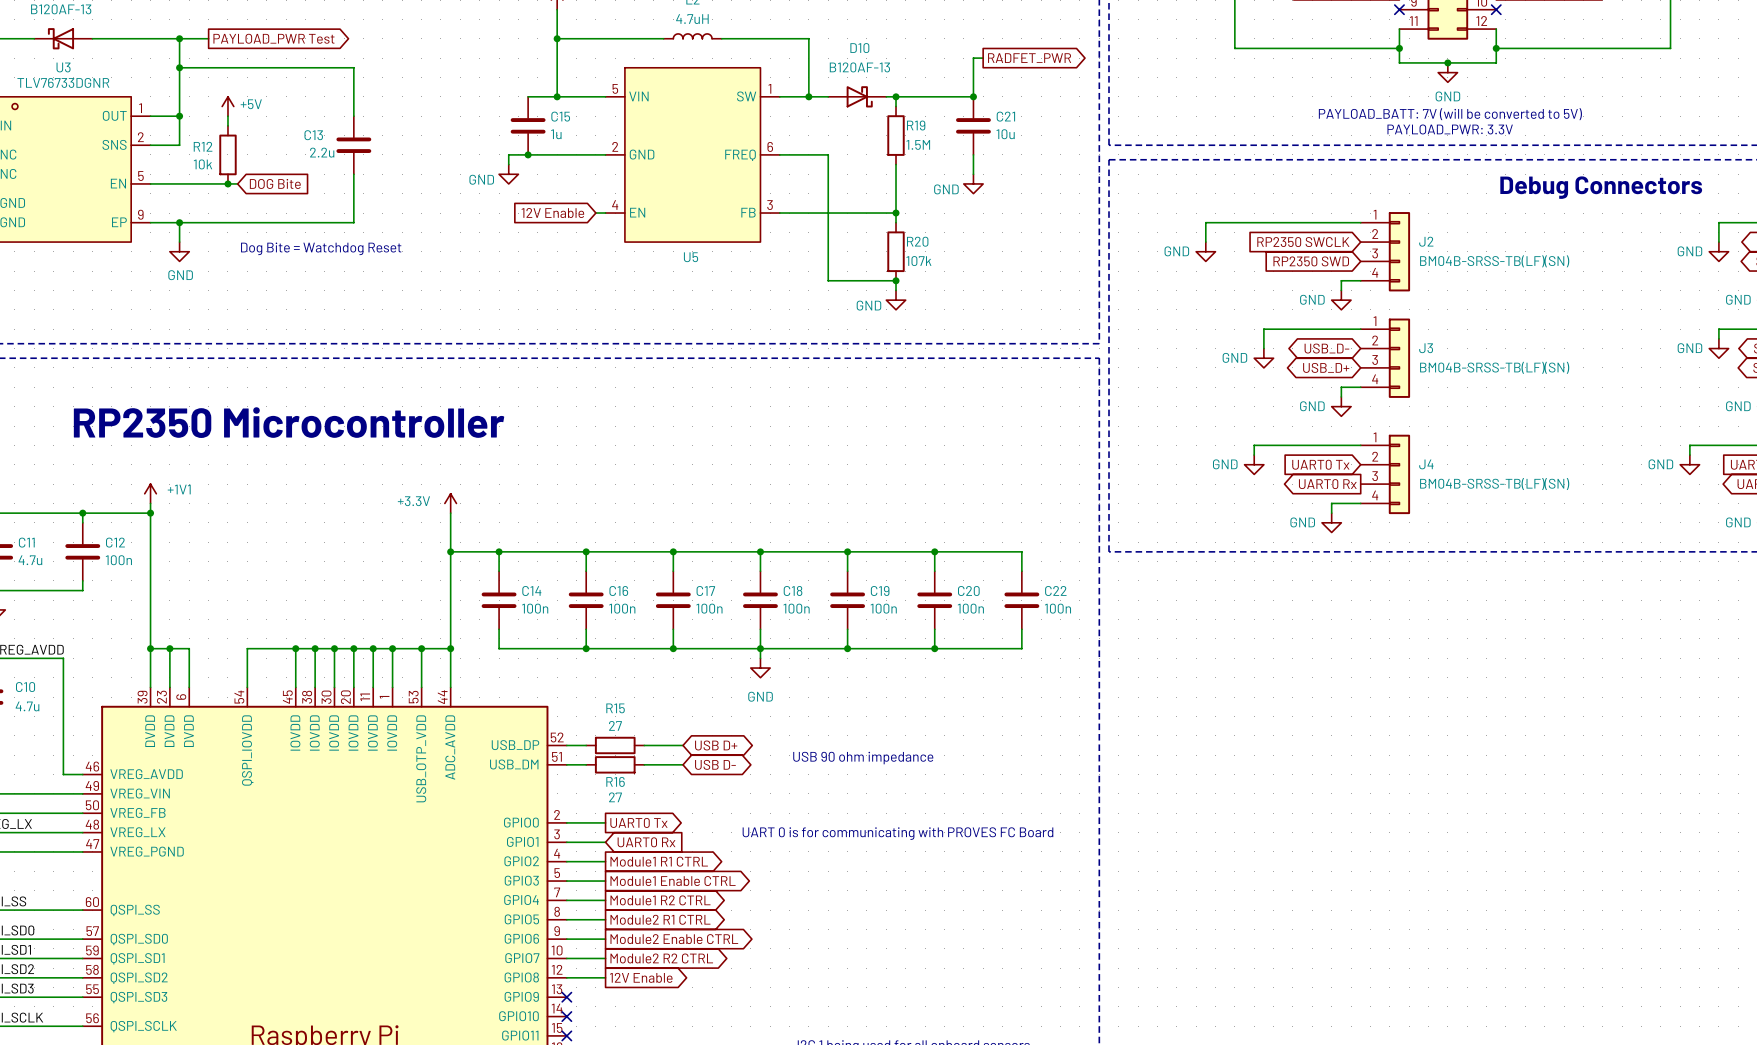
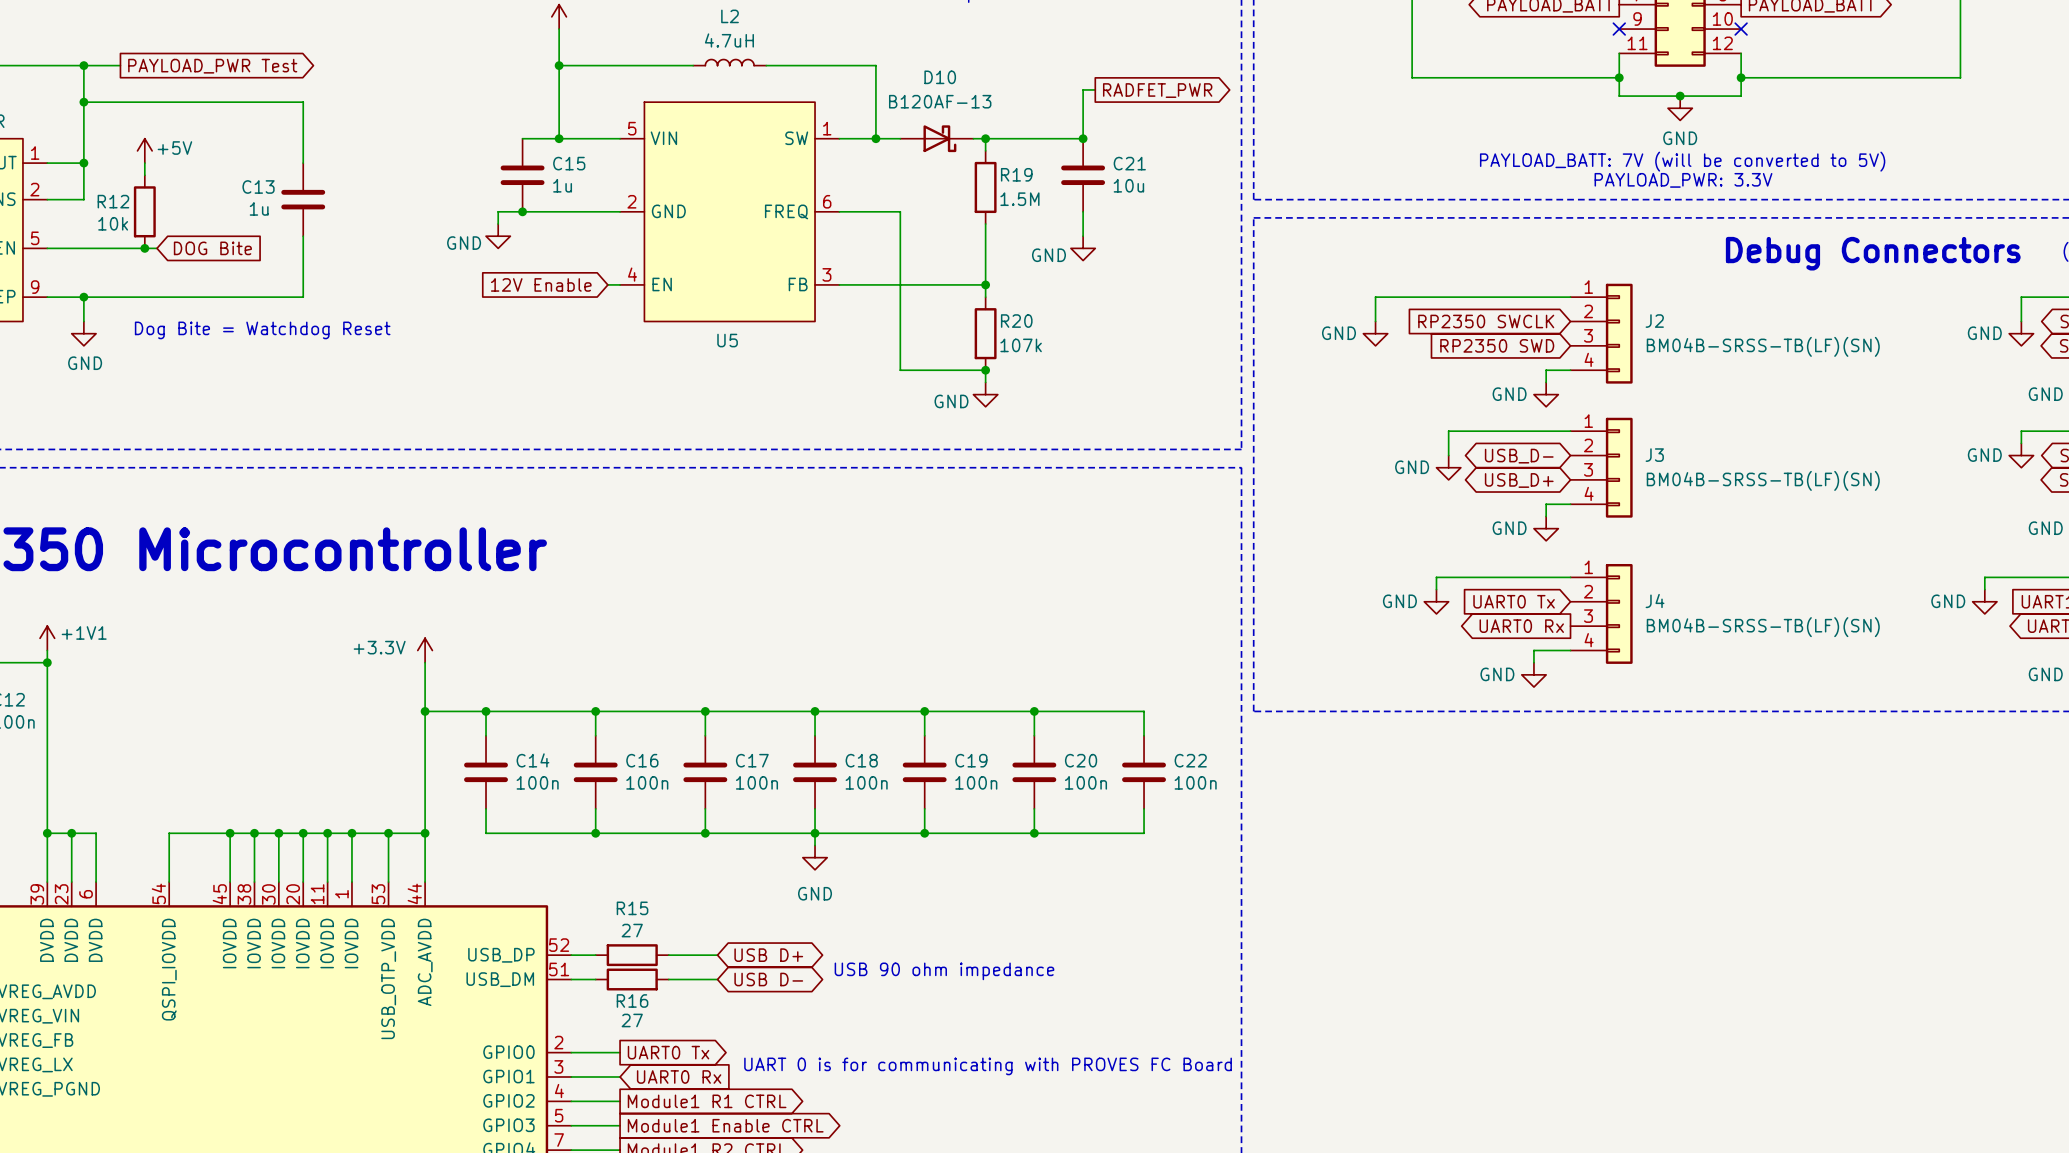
C13 value: 2.2u (322, 152) -> 1u (259, 208)

